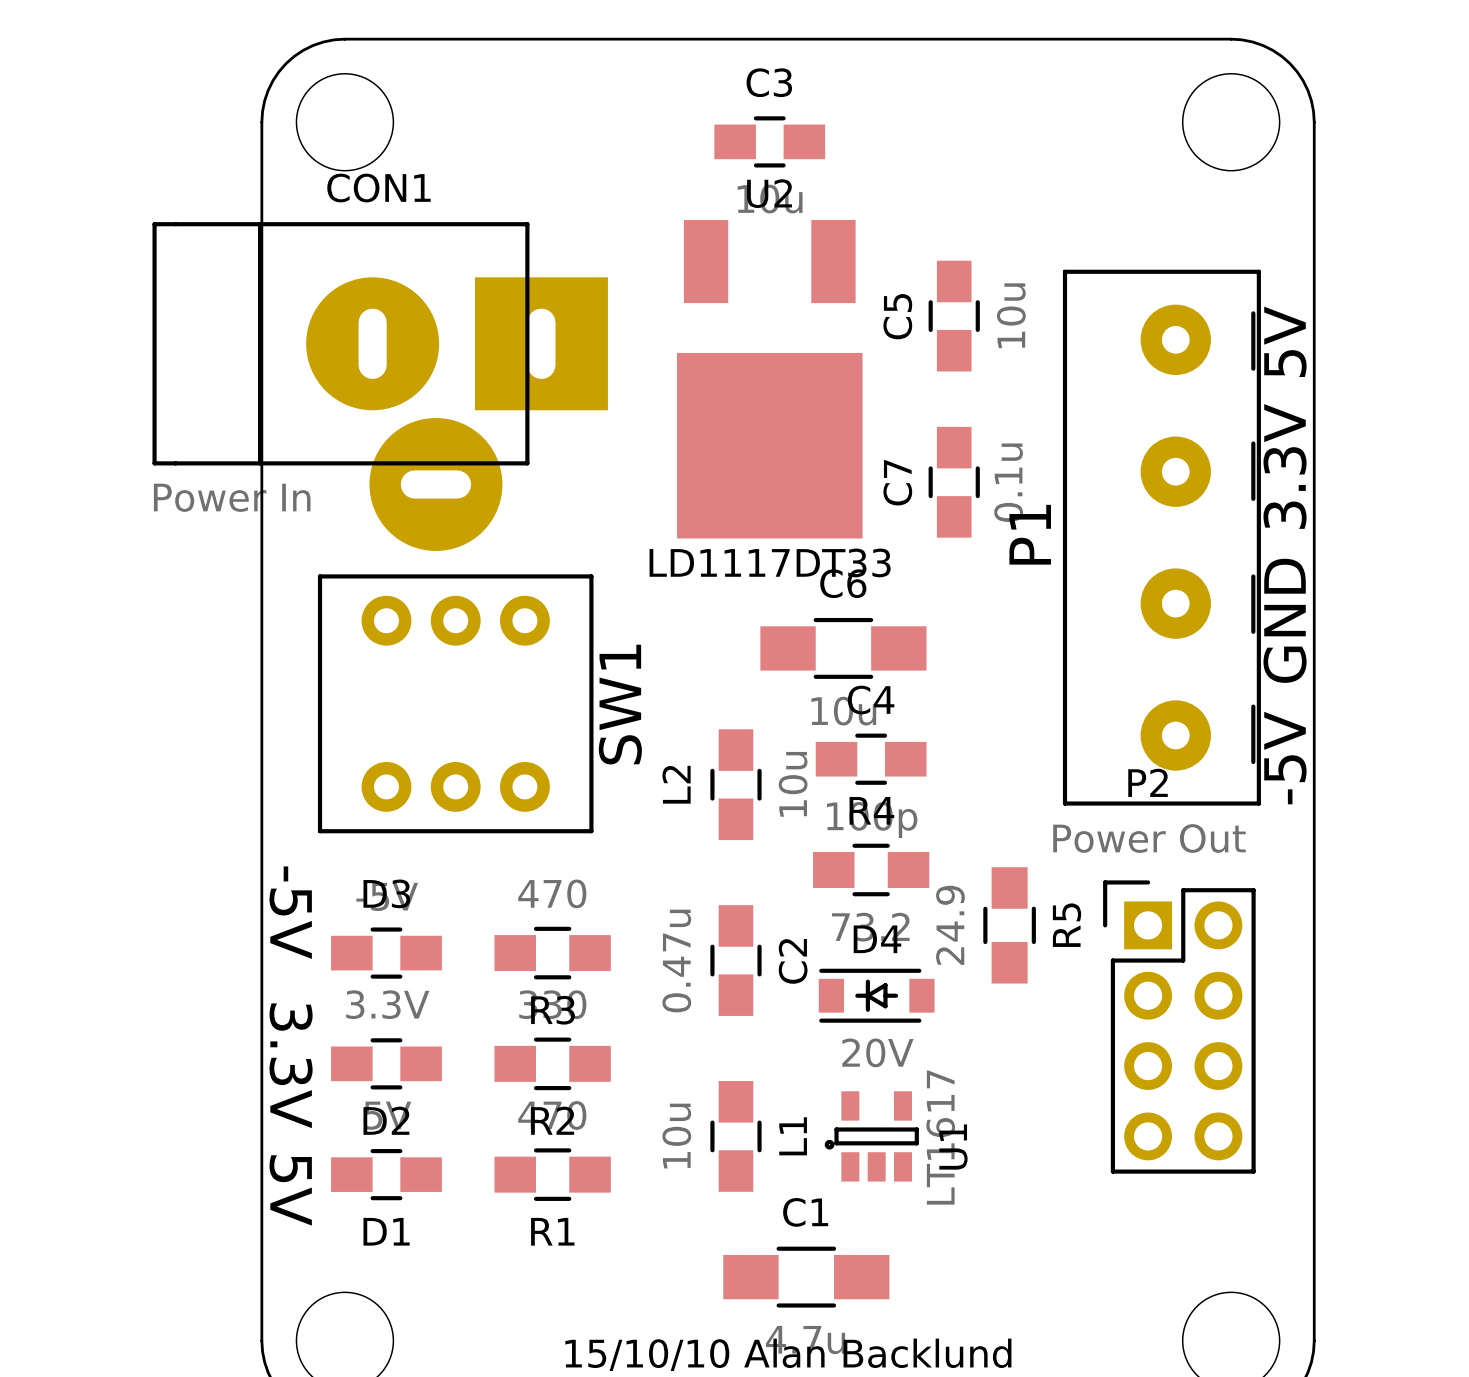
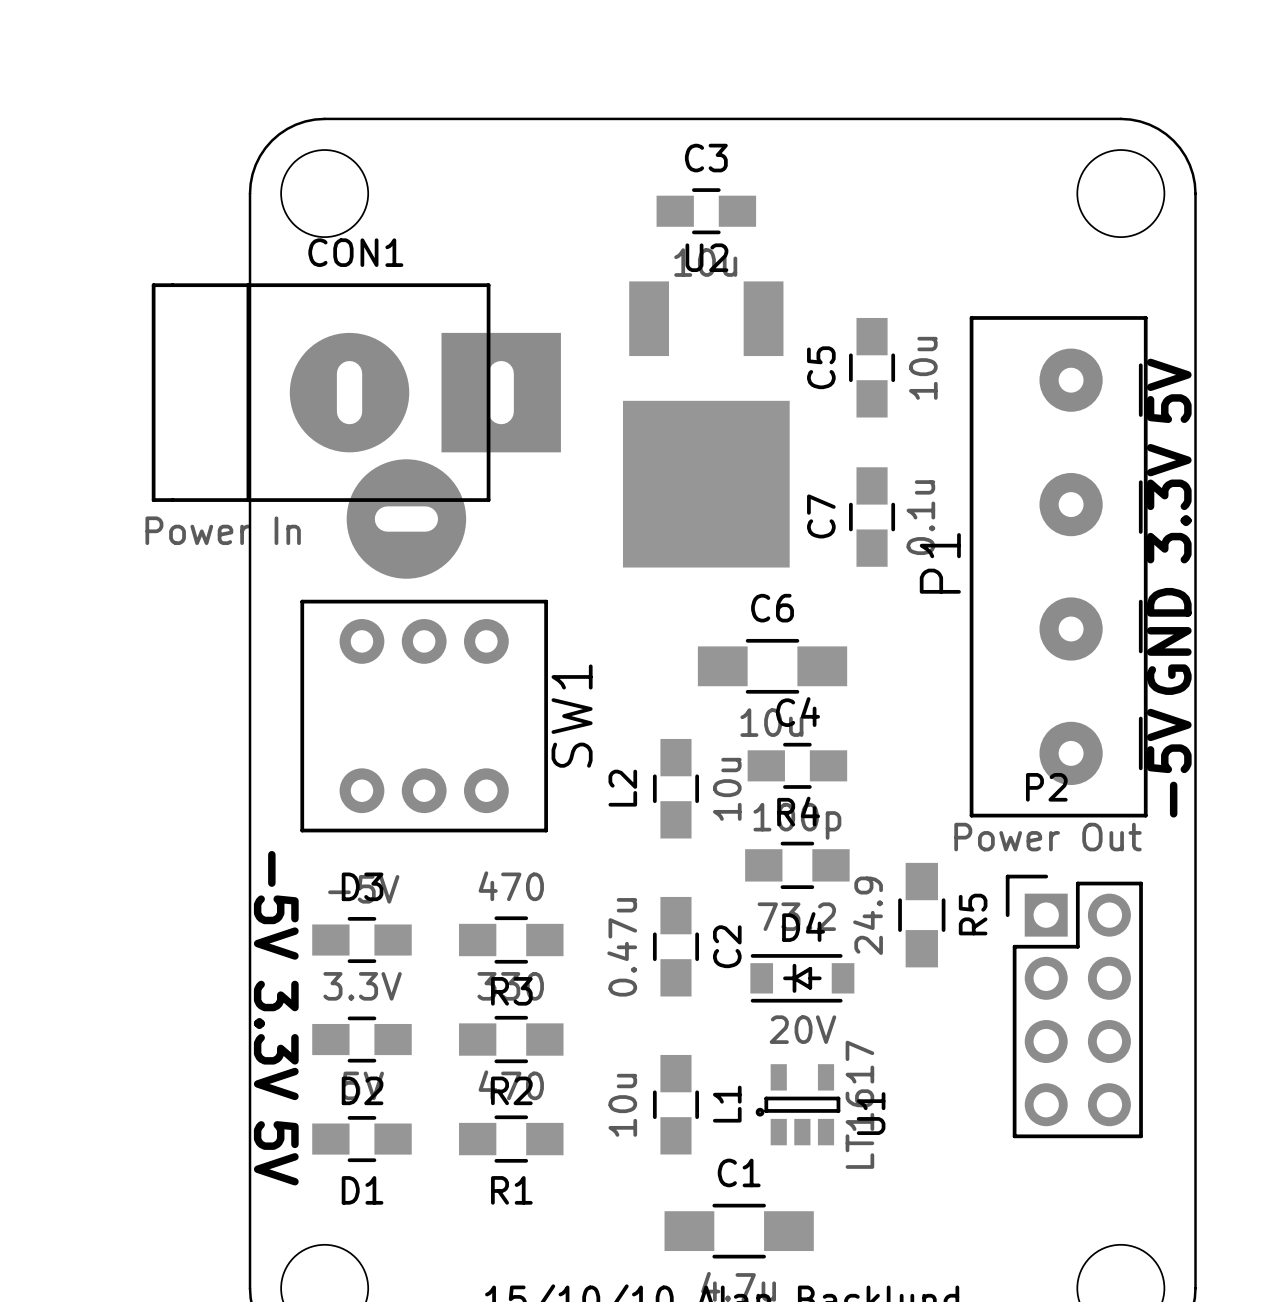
P1 footprint: [1062, 269, 1261, 806] -> [969, 316, 1148, 818]
U2 value: LD1117DT33 (770, 562) -> none

